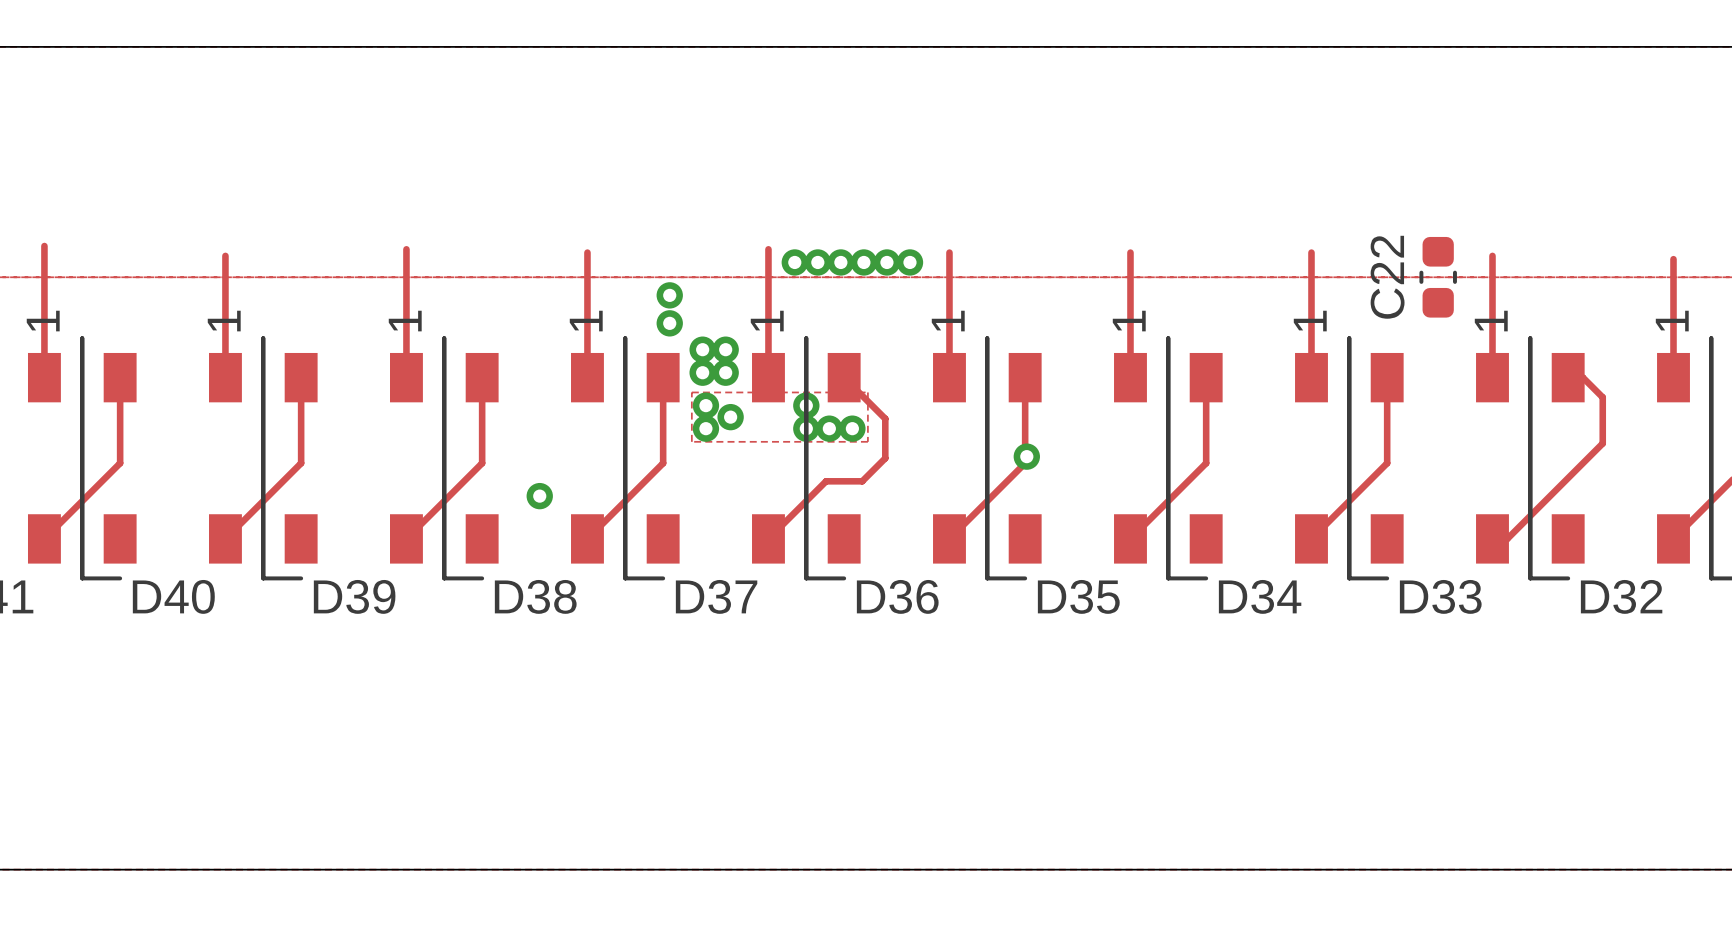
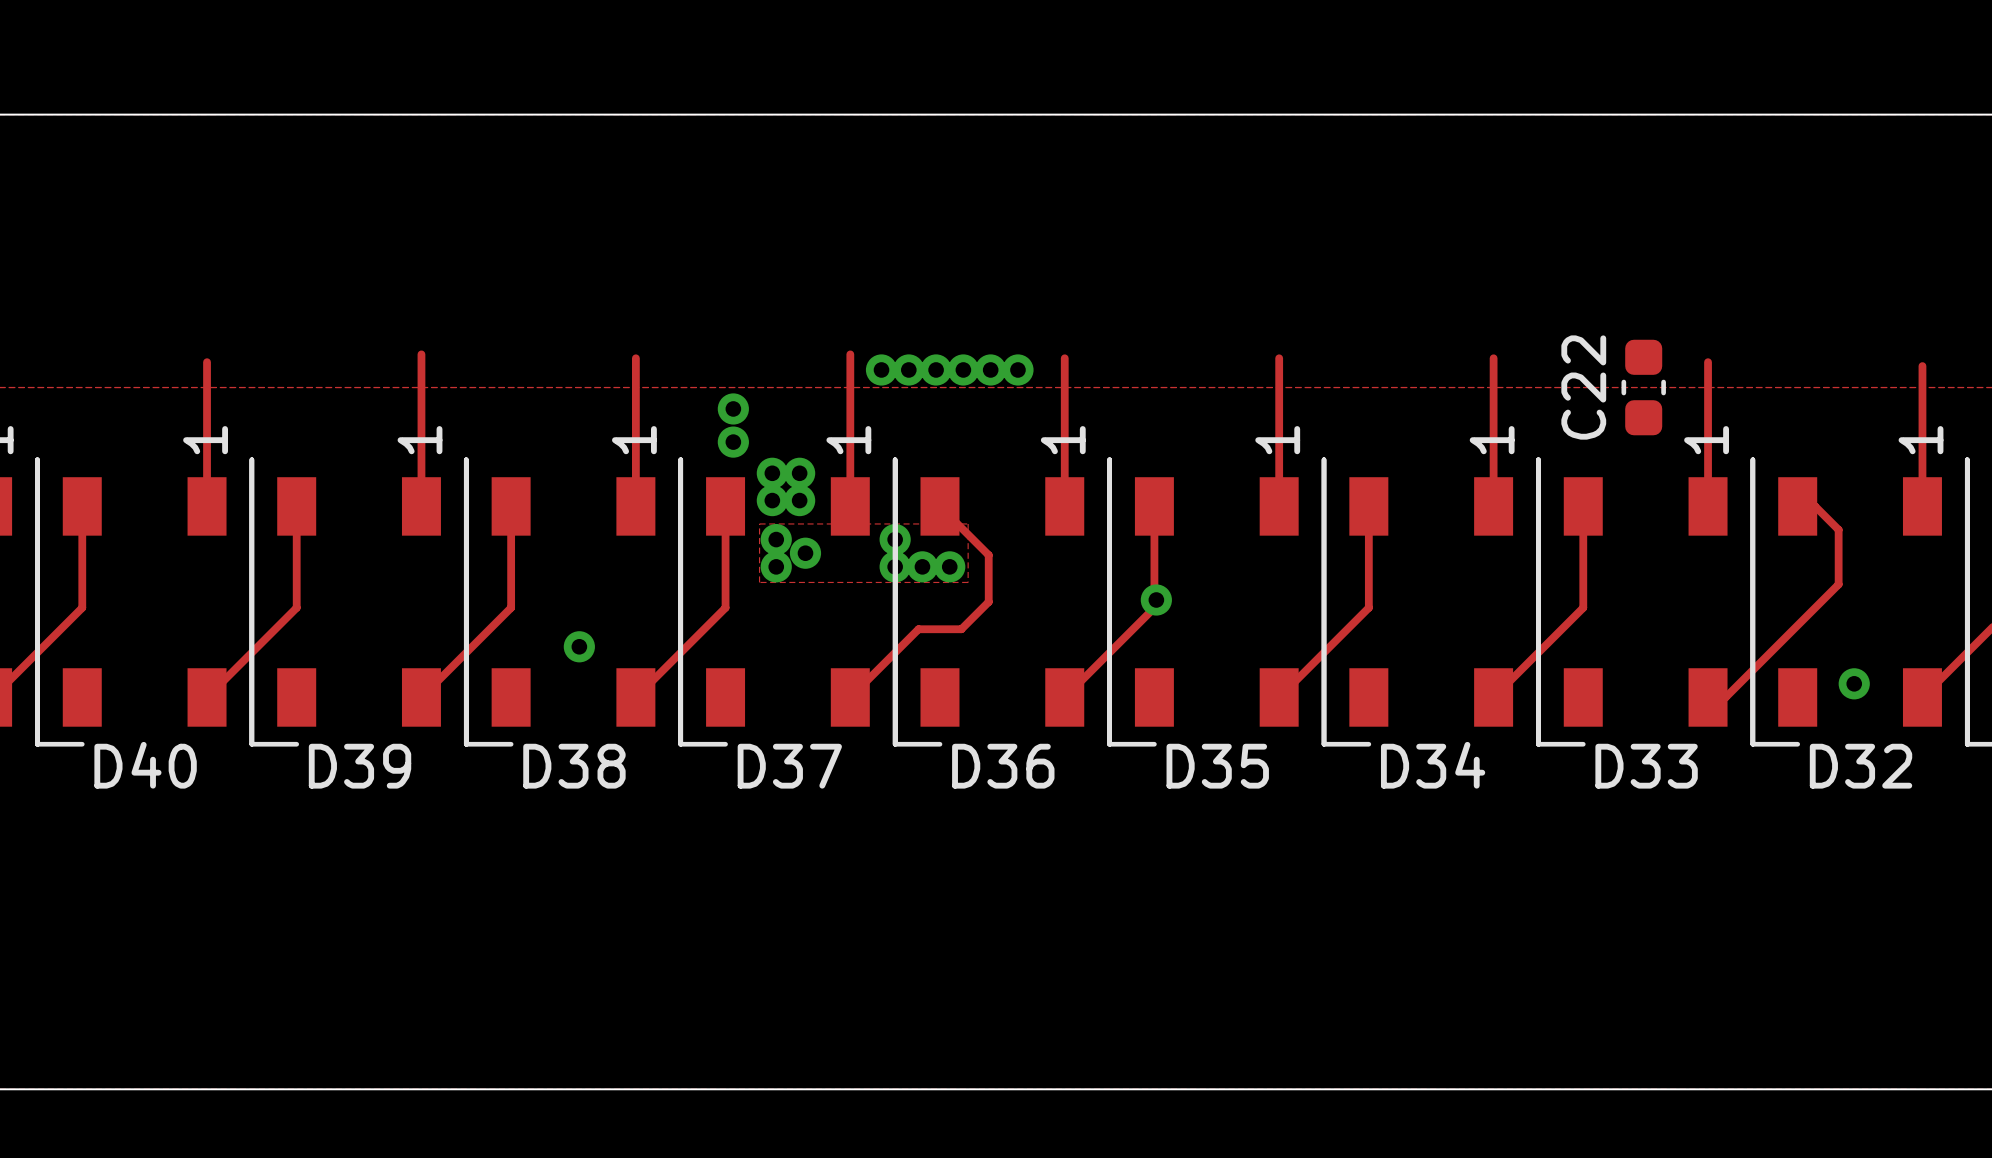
via: none -> (1854, 683)

